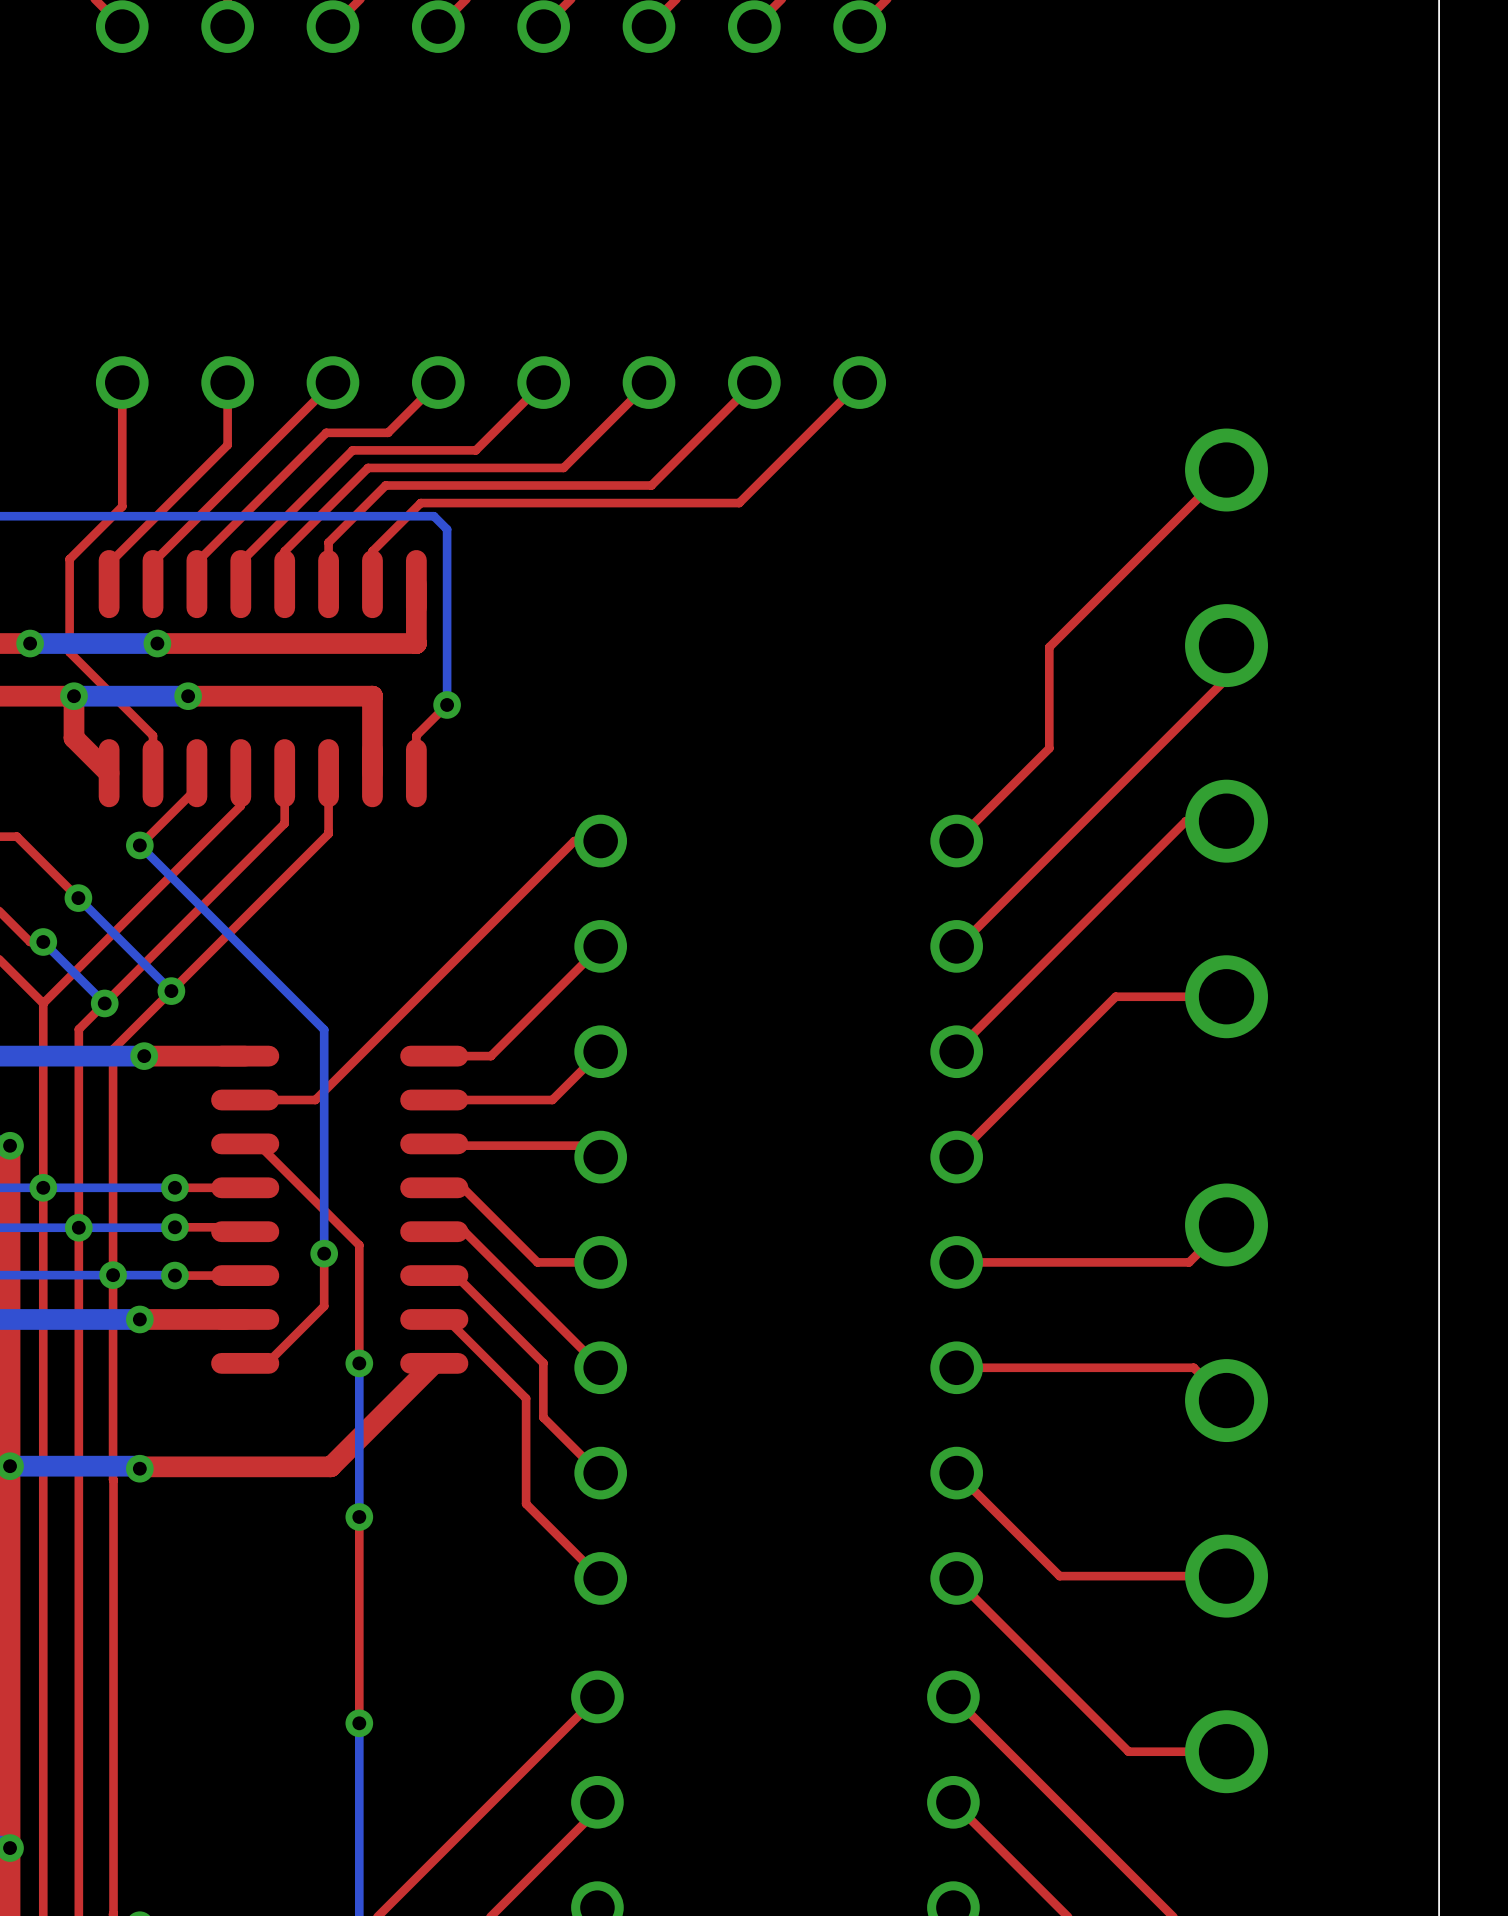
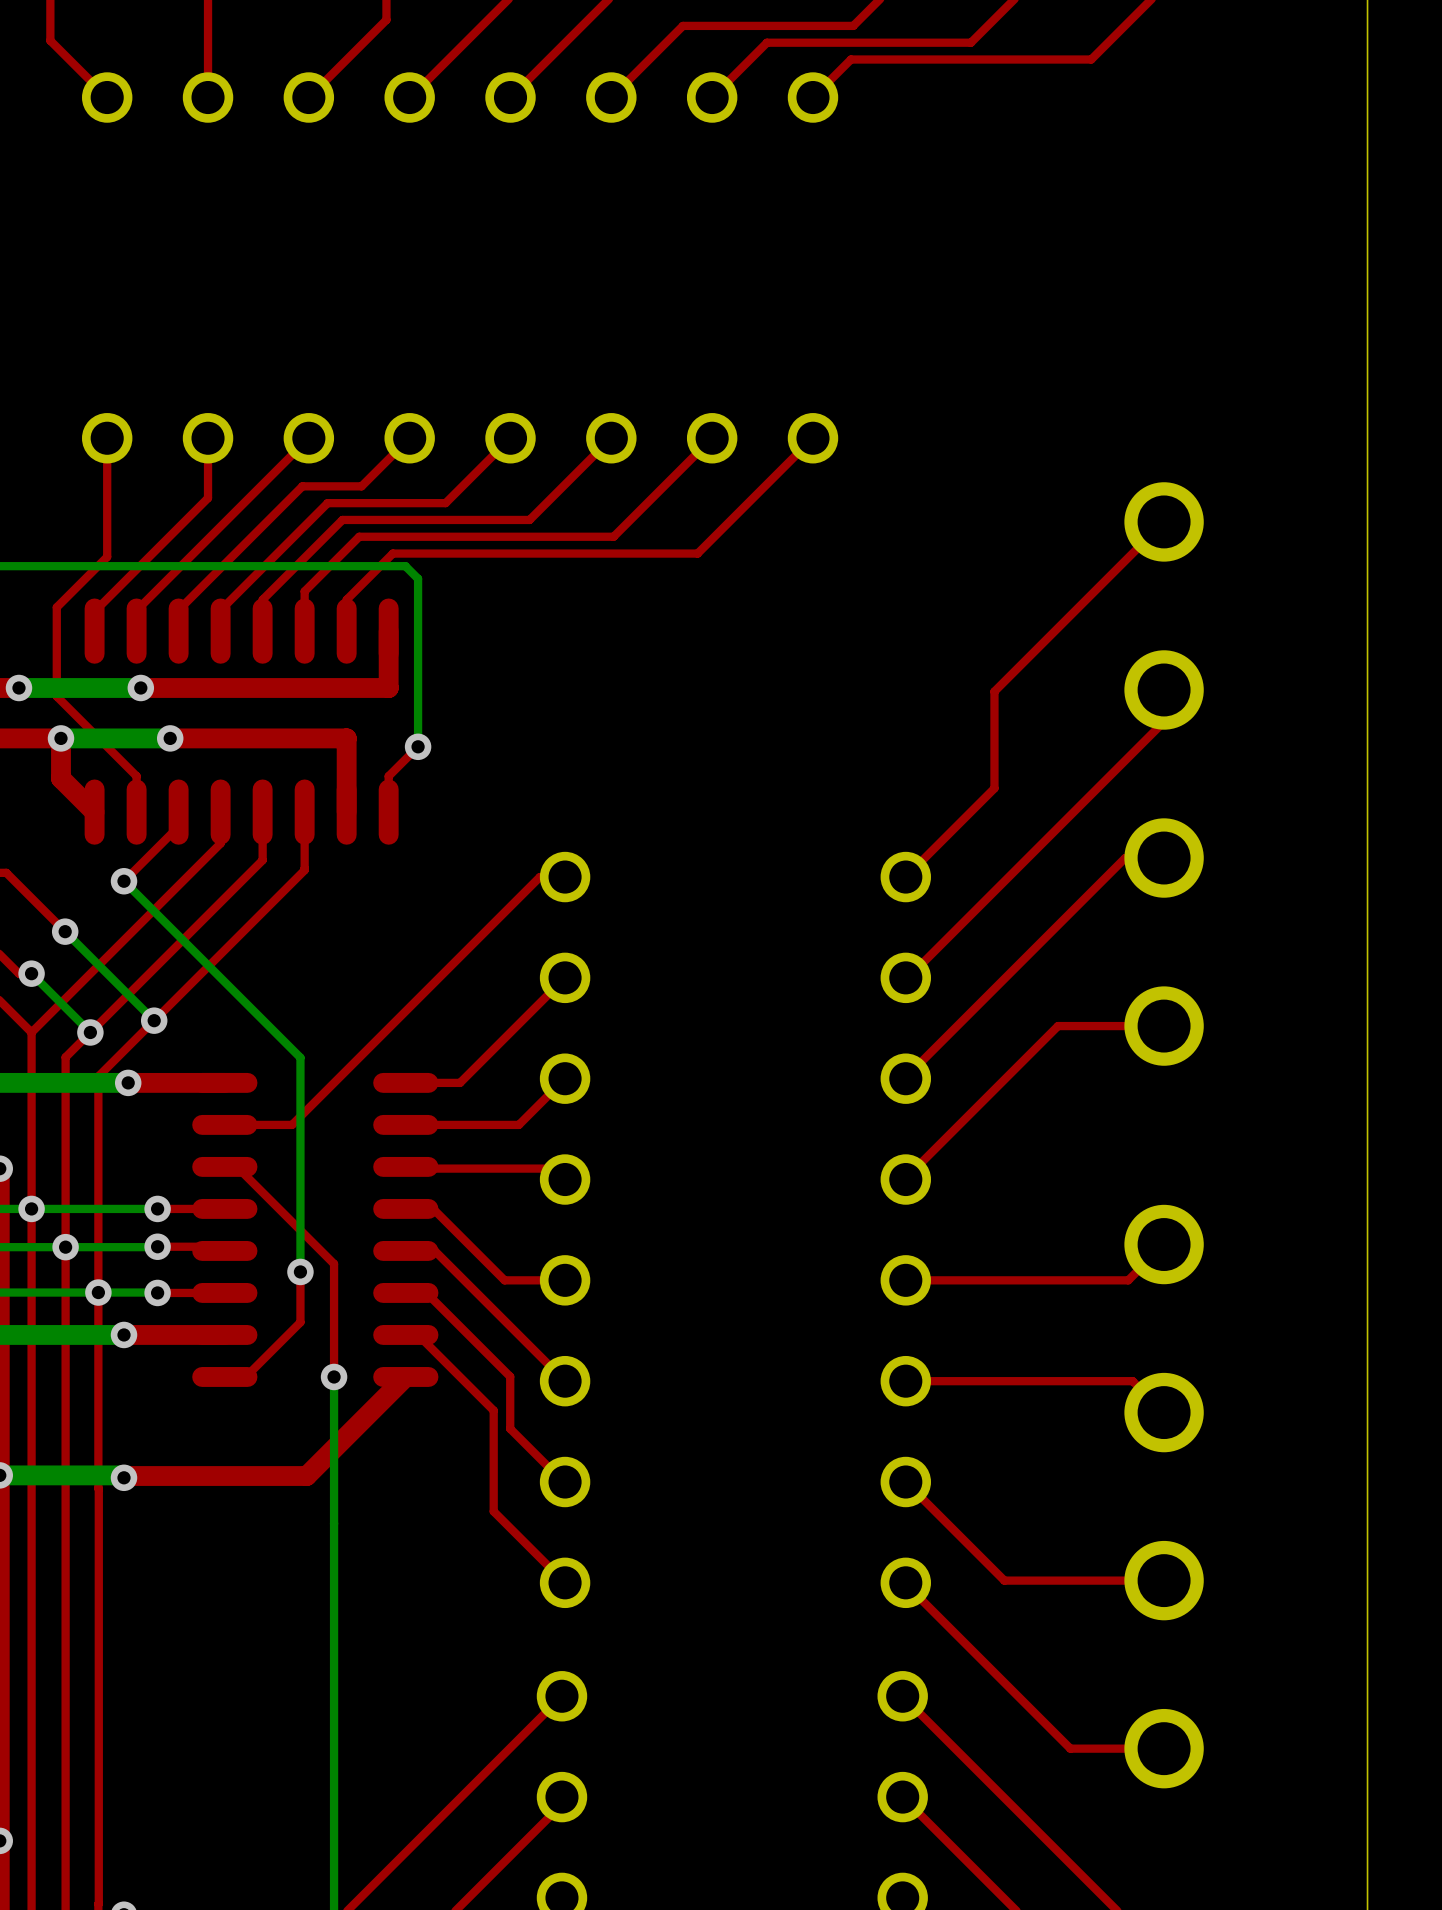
top track: (359, 1516) (359, 1723) -> none
bottom track: none -> (334, 1524) (334, 1721)
via: (359, 1516) -> none
via: (359, 1723) -> none

